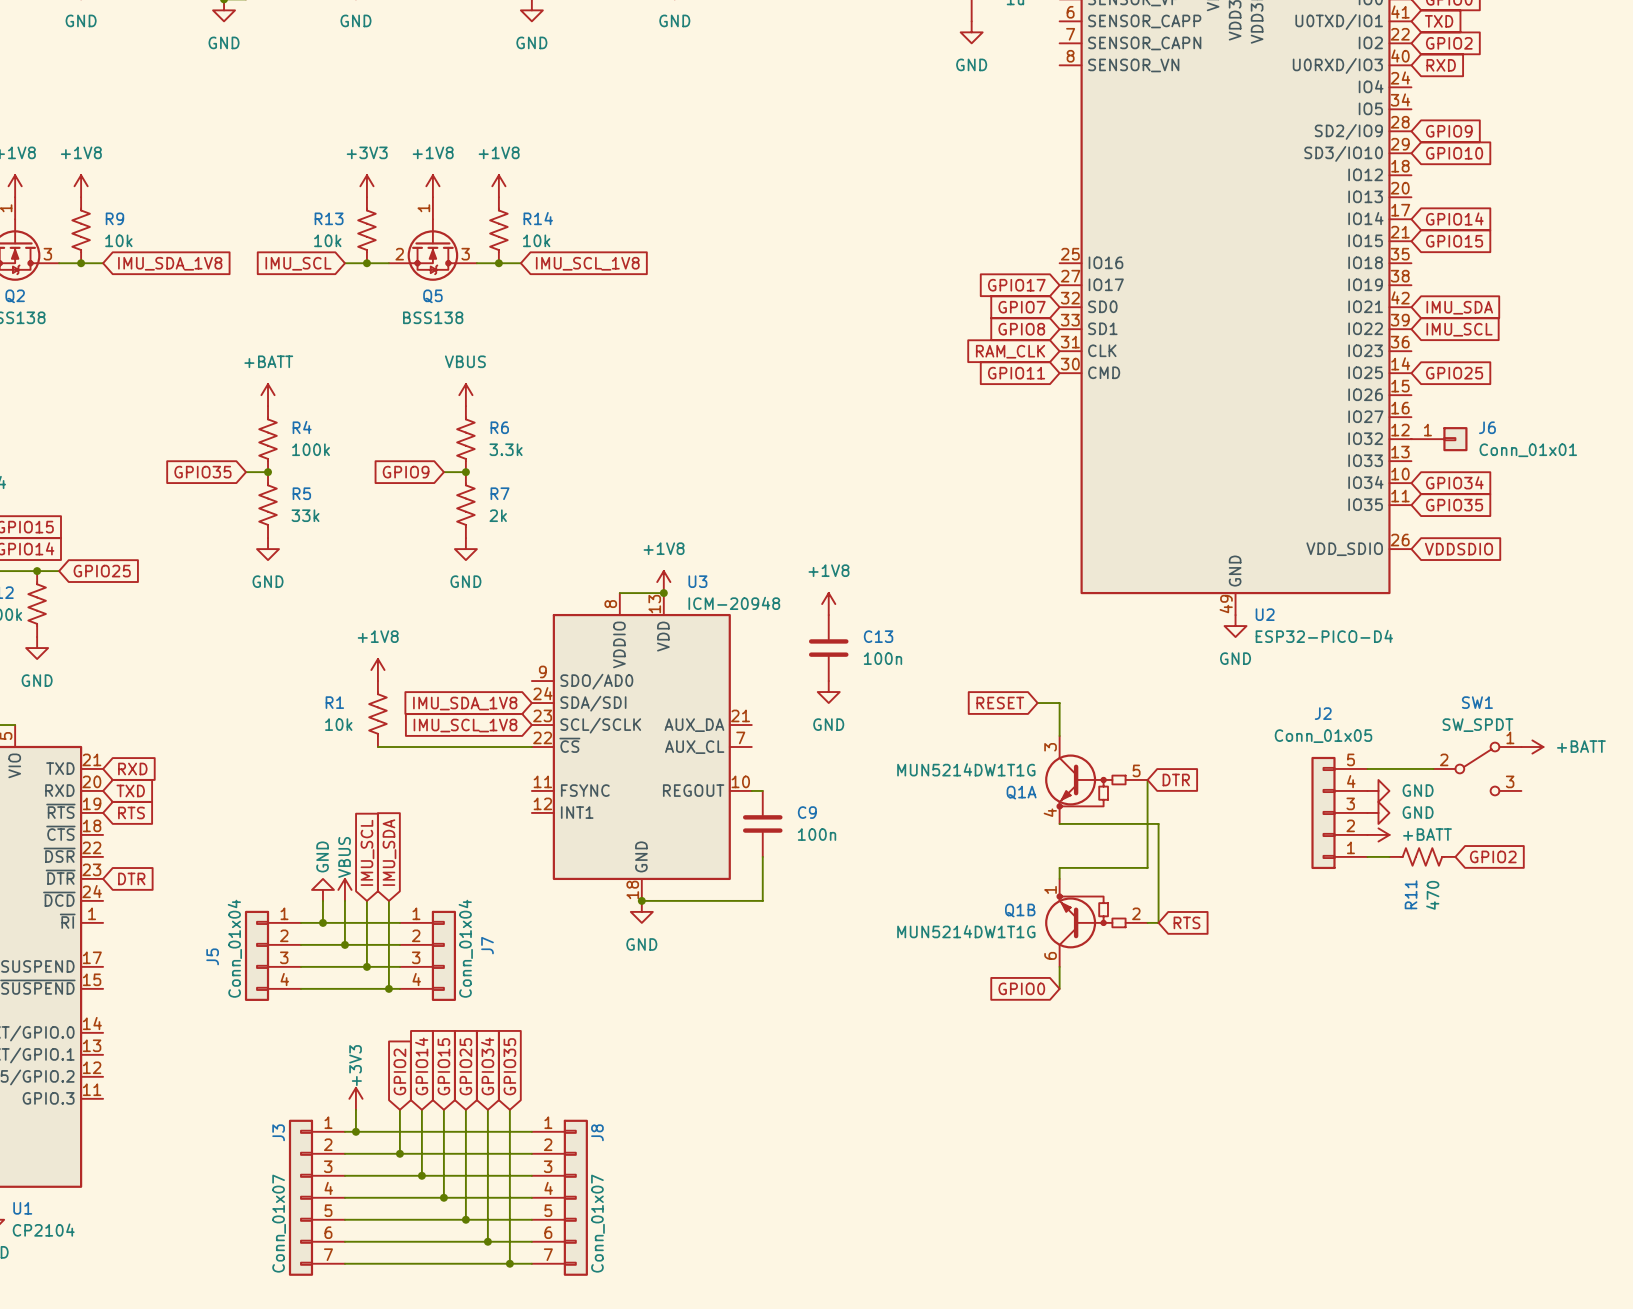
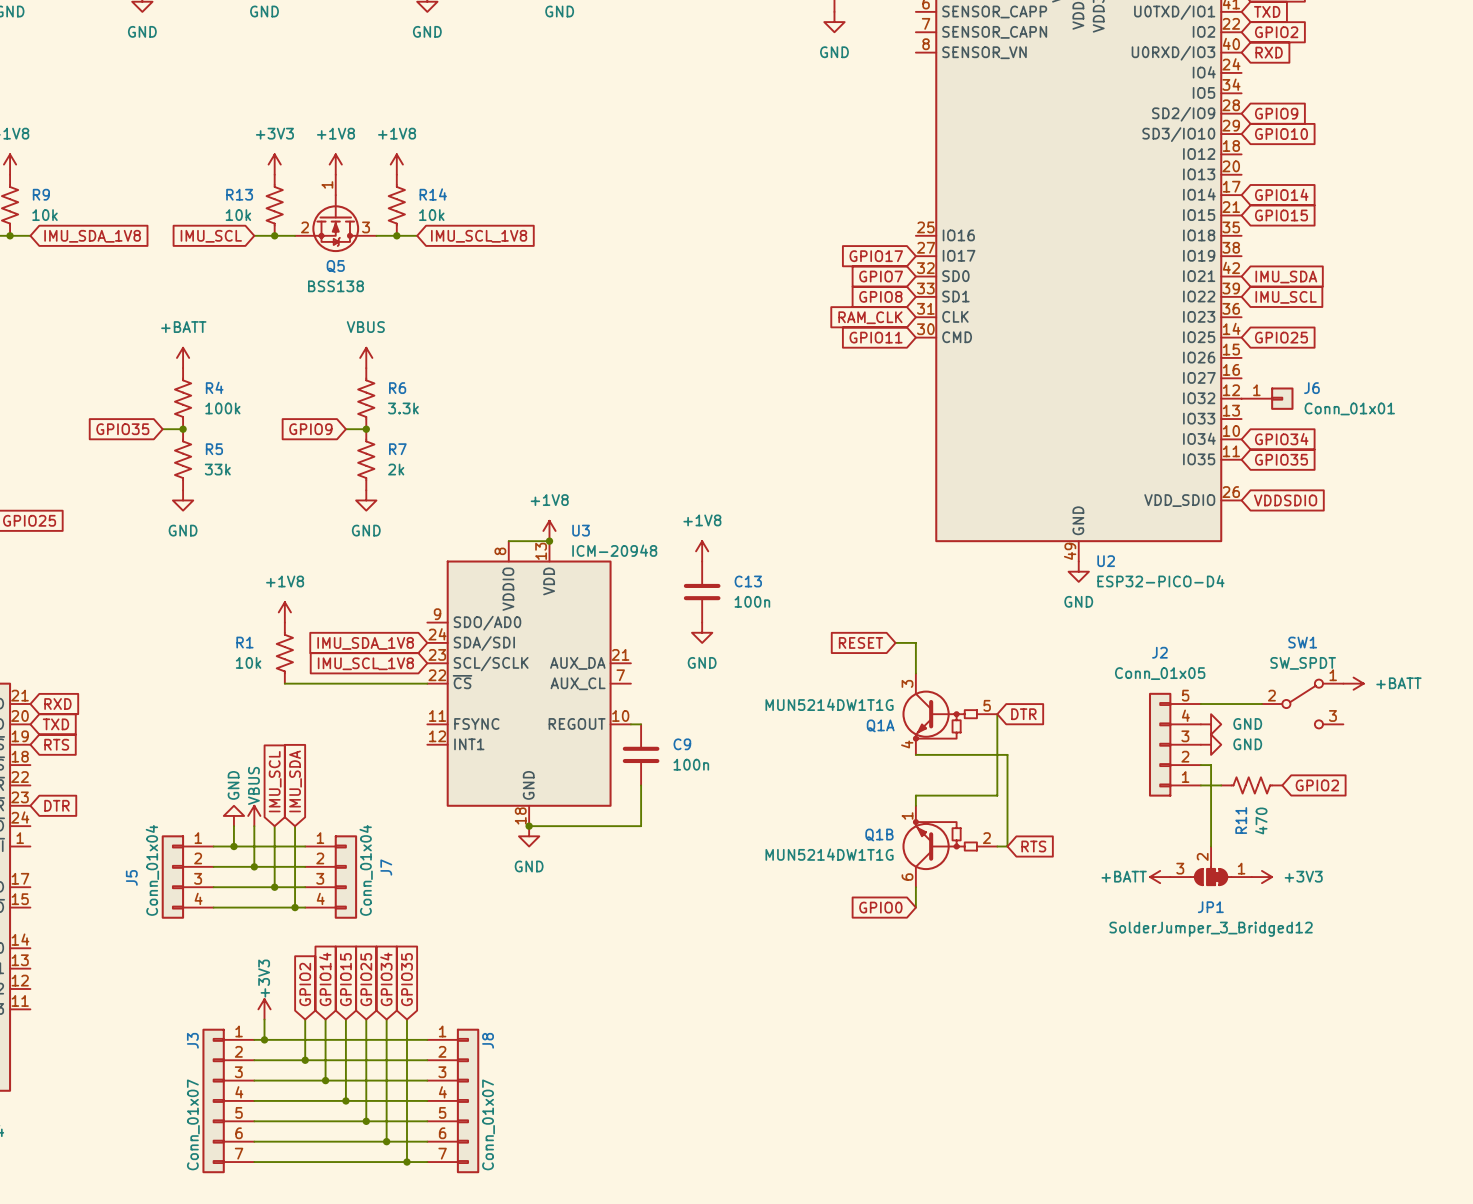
wire: none -> (1200, 765) (1211, 765) (1211, 846)
power symbol rotation: 0° (1378, 834) -> 180° (1160, 877)
power symbol position: +BATT (1378, 834) -> +BATT (1160, 877)
JP1: none -> SolderJumper_3_Bridged12 (1211, 865)
power symbol: none -> +3V3 (1261, 877)

